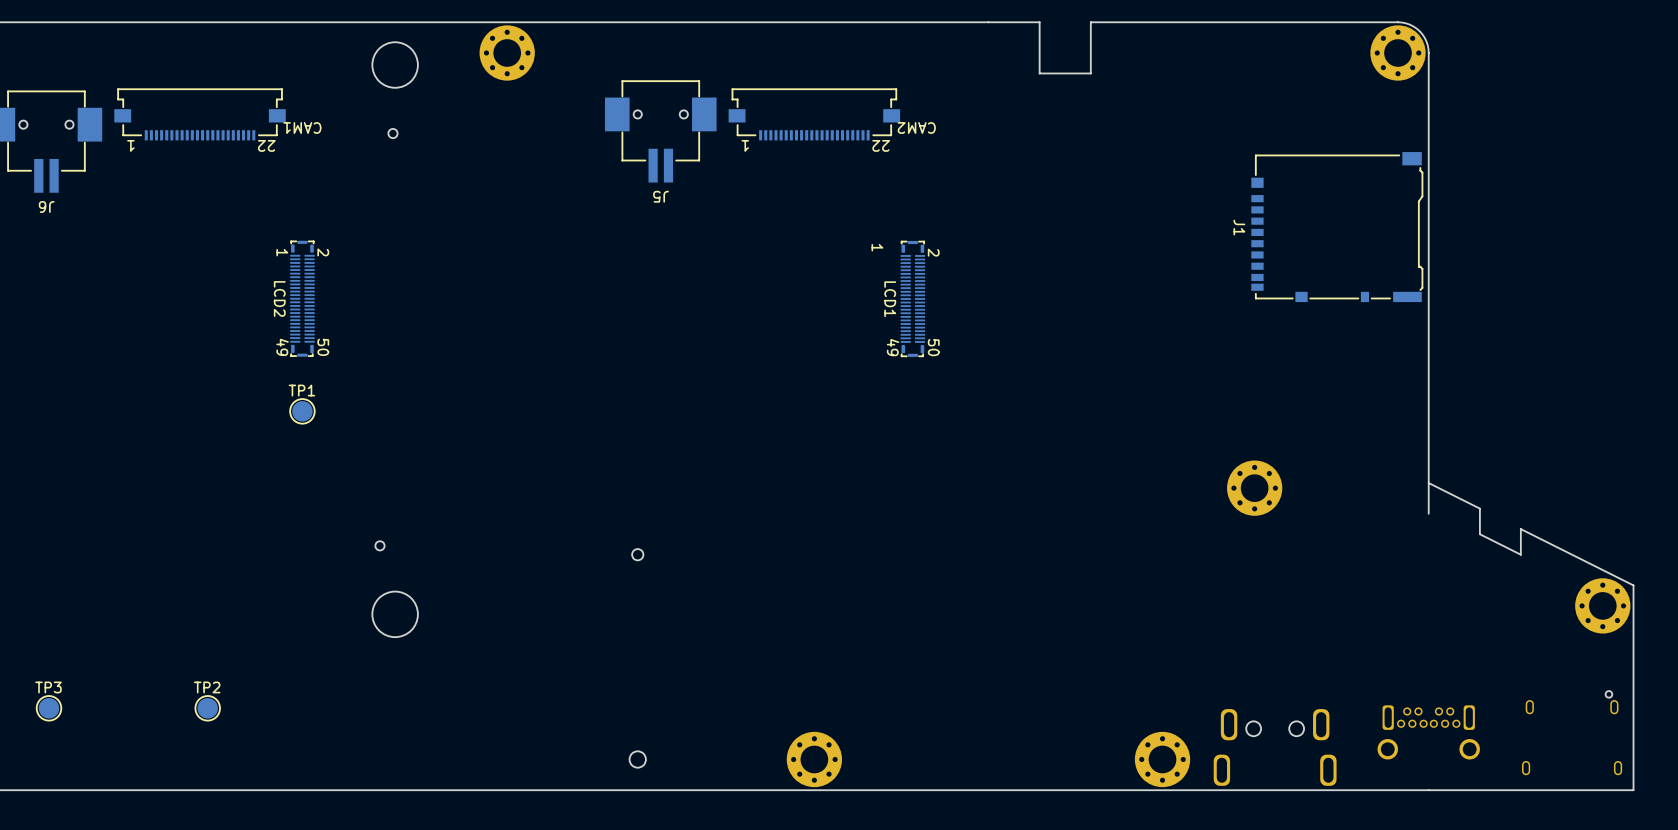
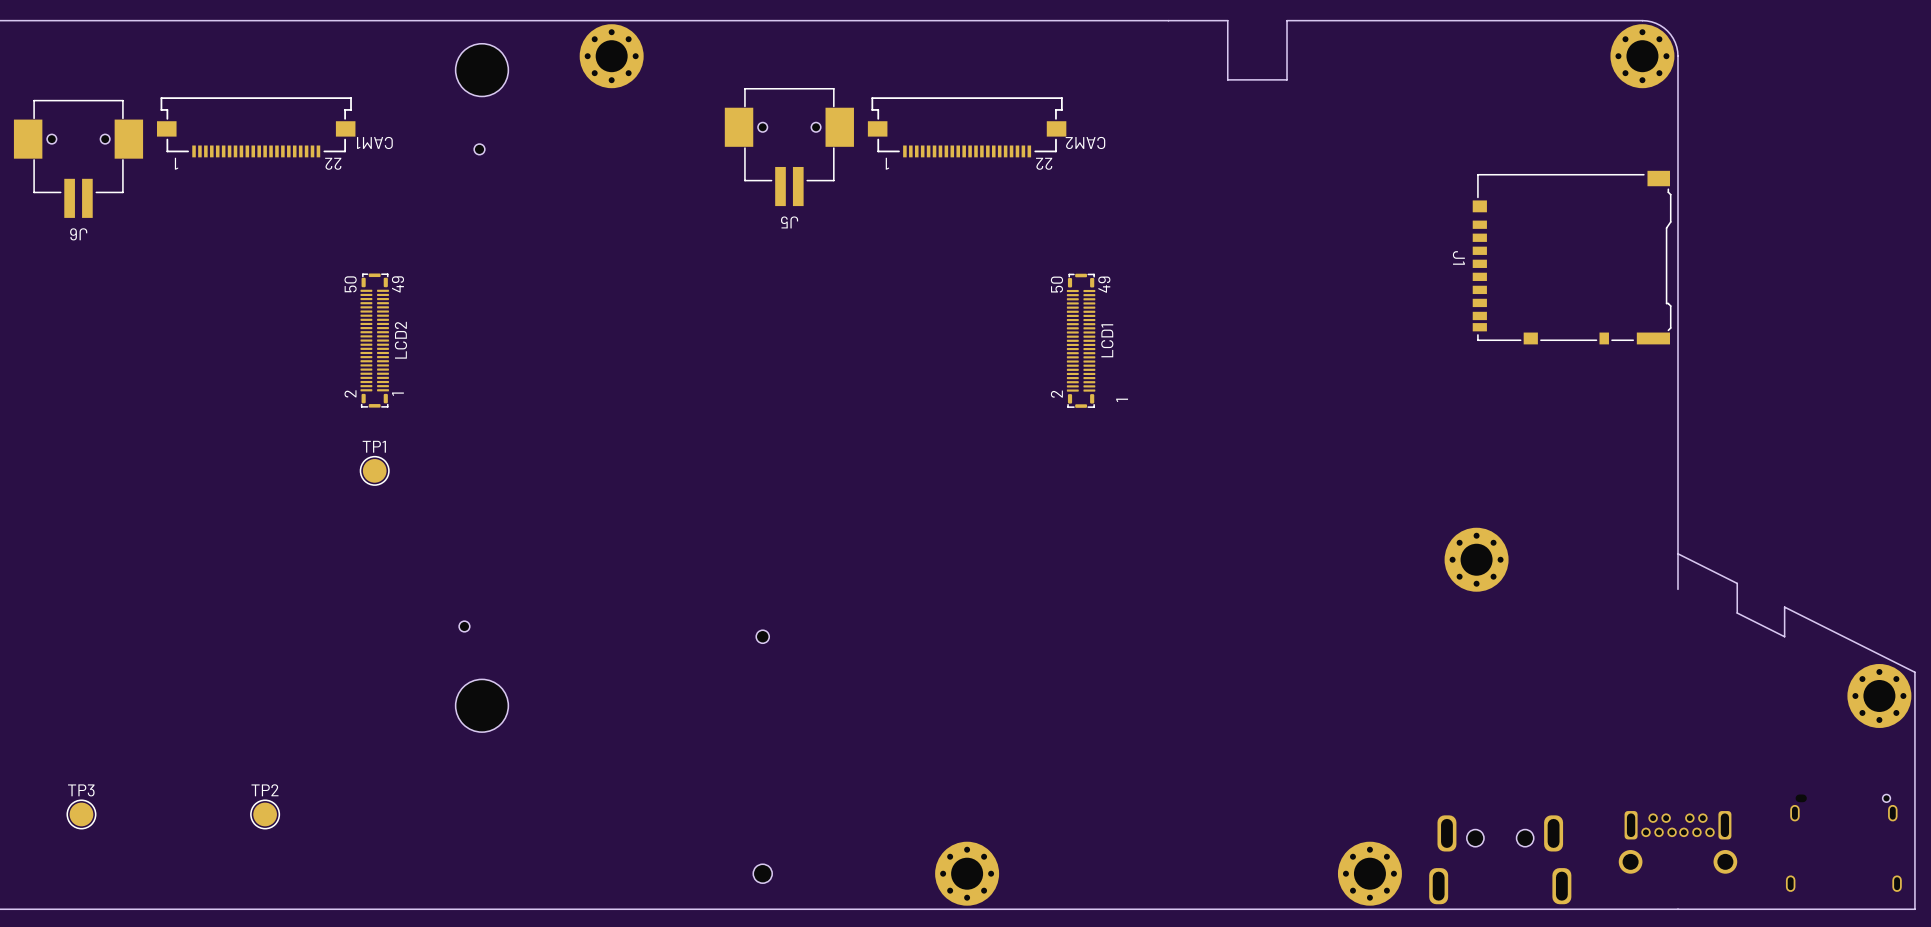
LCD2 rotation: 0° (302, 298) -> 180° (374, 340)
LCD1 rotation: 0° (912, 298) -> 180° (1081, 340)

